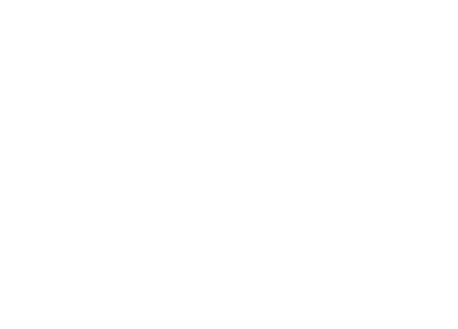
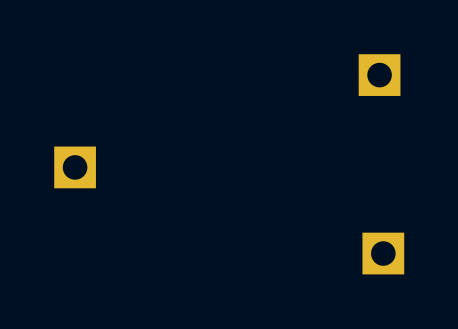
part: none -> (379, 75)
part: none -> (75, 167)
part: none -> (383, 253)

